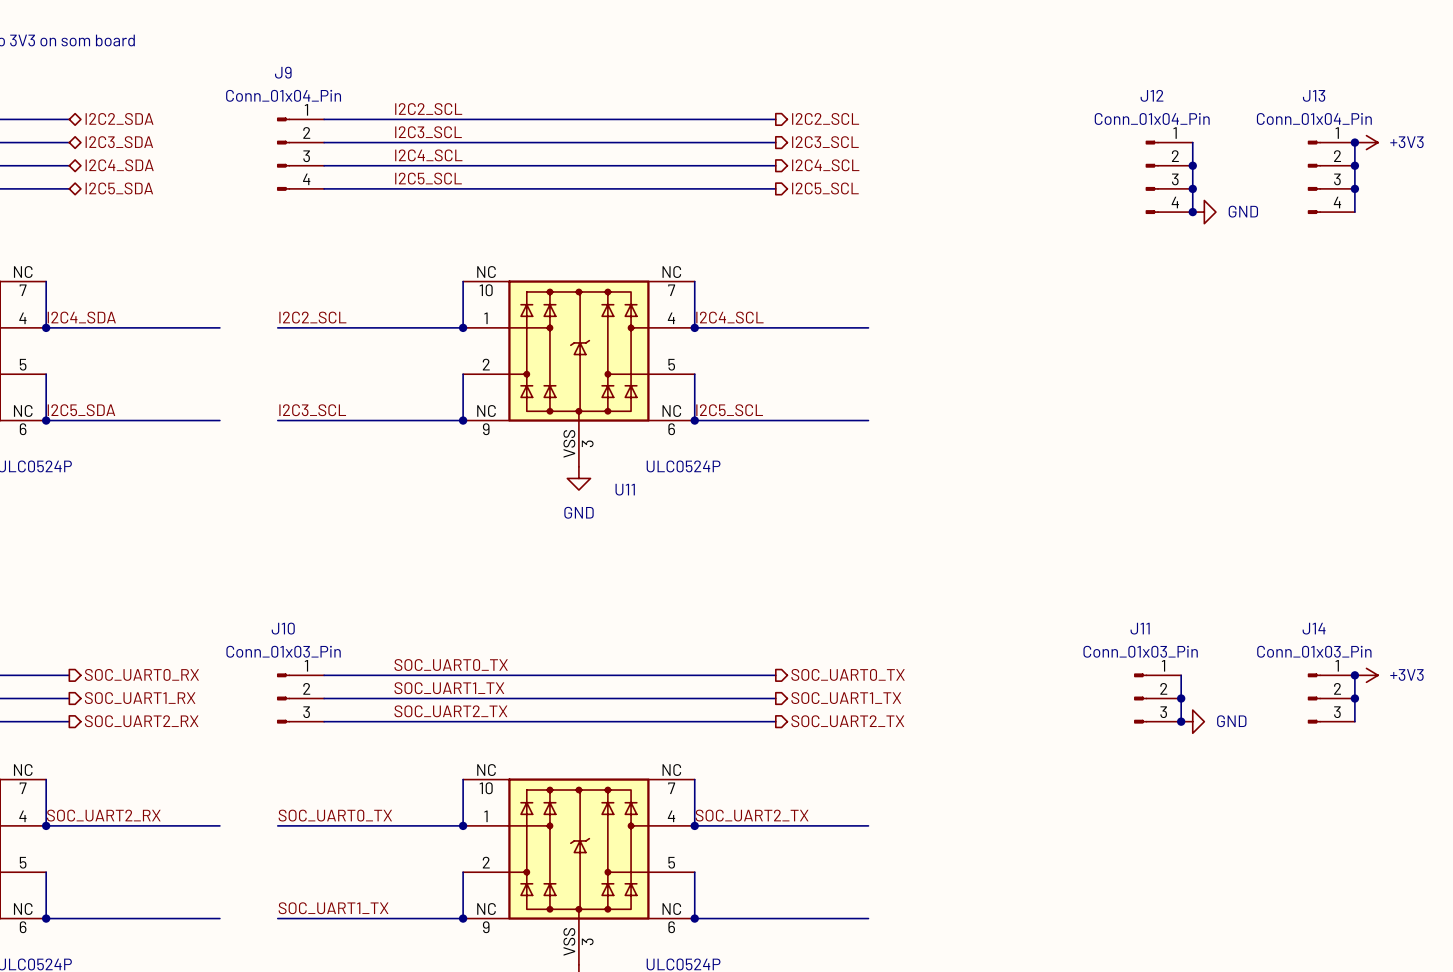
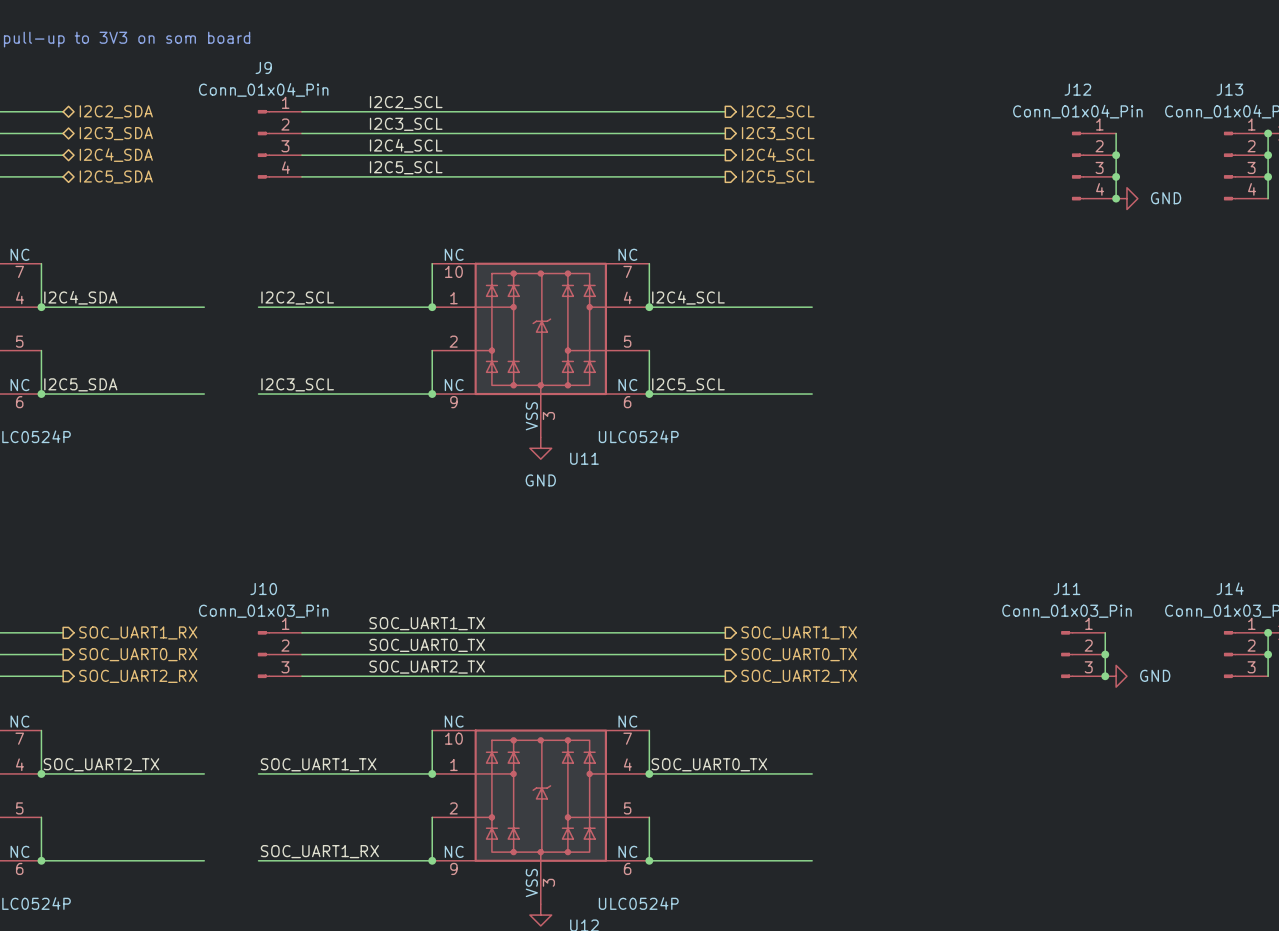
label: SOC_UART0_TX (451, 665) -> SOC_UART1_TX (427, 623)
hierarchical label: SOC_UART0_RX (141, 674) -> SOC_UART1_RX (138, 632)
hierarchical label: SOC_UART0_TX (848, 674) -> SOC_UART1_TX (799, 632)
label: SOC_UART1_TX (449, 688) -> SOC_UART0_TX (427, 645)
hierarchical label: SOC_UART1_RX (140, 698) -> SOC_UART0_RX (138, 654)
hierarchical label: SOC_UART1_TX (846, 698) -> SOC_UART0_TX (799, 654)
label: SOC_UART2_RX (103, 815) -> SOC_UART2_TX (101, 764)
label: SOC_UART0_TX (335, 815) -> SOC_UART1_TX (318, 764)
label: SOC_UART2_TX (752, 815) -> SOC_UART0_TX (709, 764)
label: SOC_UART1_TX (333, 908) -> SOC_UART1_RX (319, 851)

